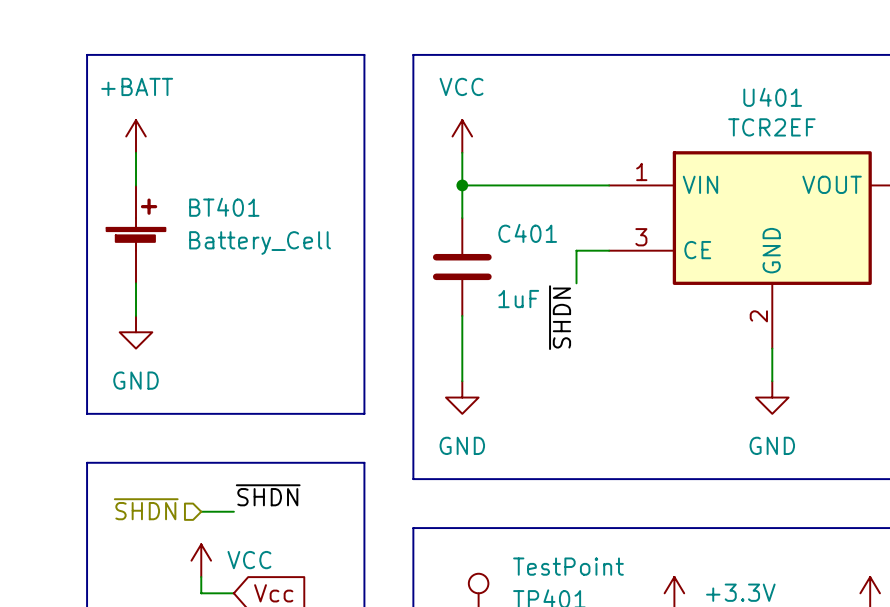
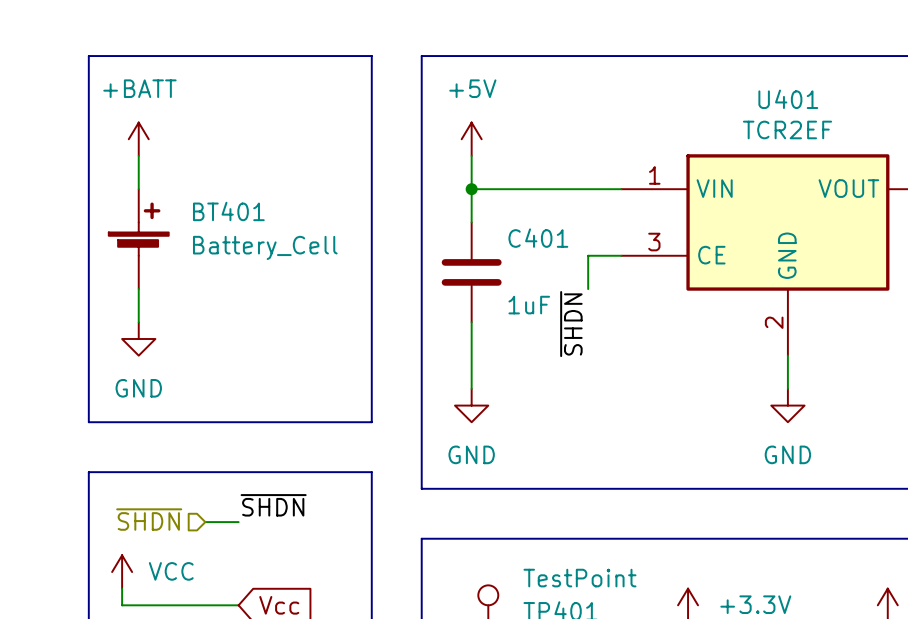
power symbol: VCC (462, 136) -> +5V (471, 139)
power symbol position: VCC (201, 560) -> VCC (122, 572)
wire: (201, 577) (201, 593) -> (122, 588) (122, 605) (205, 605)

